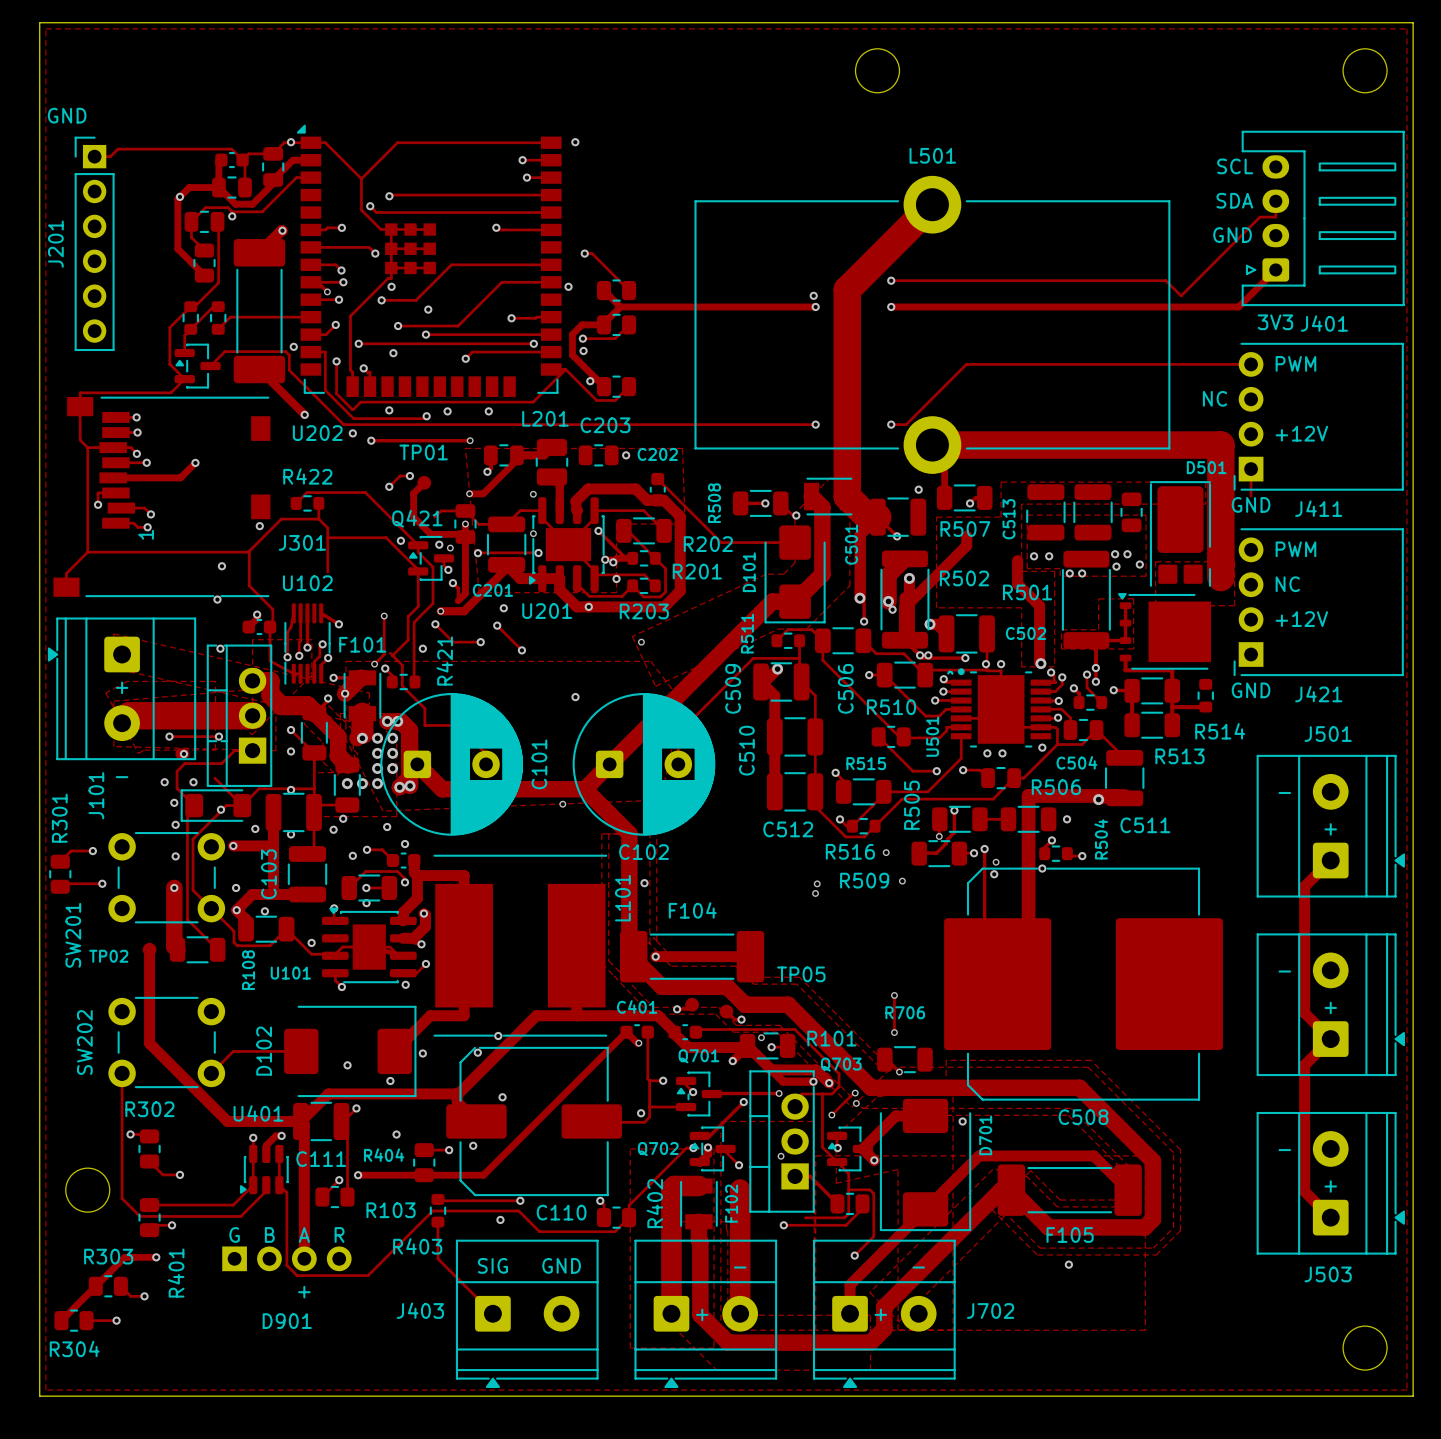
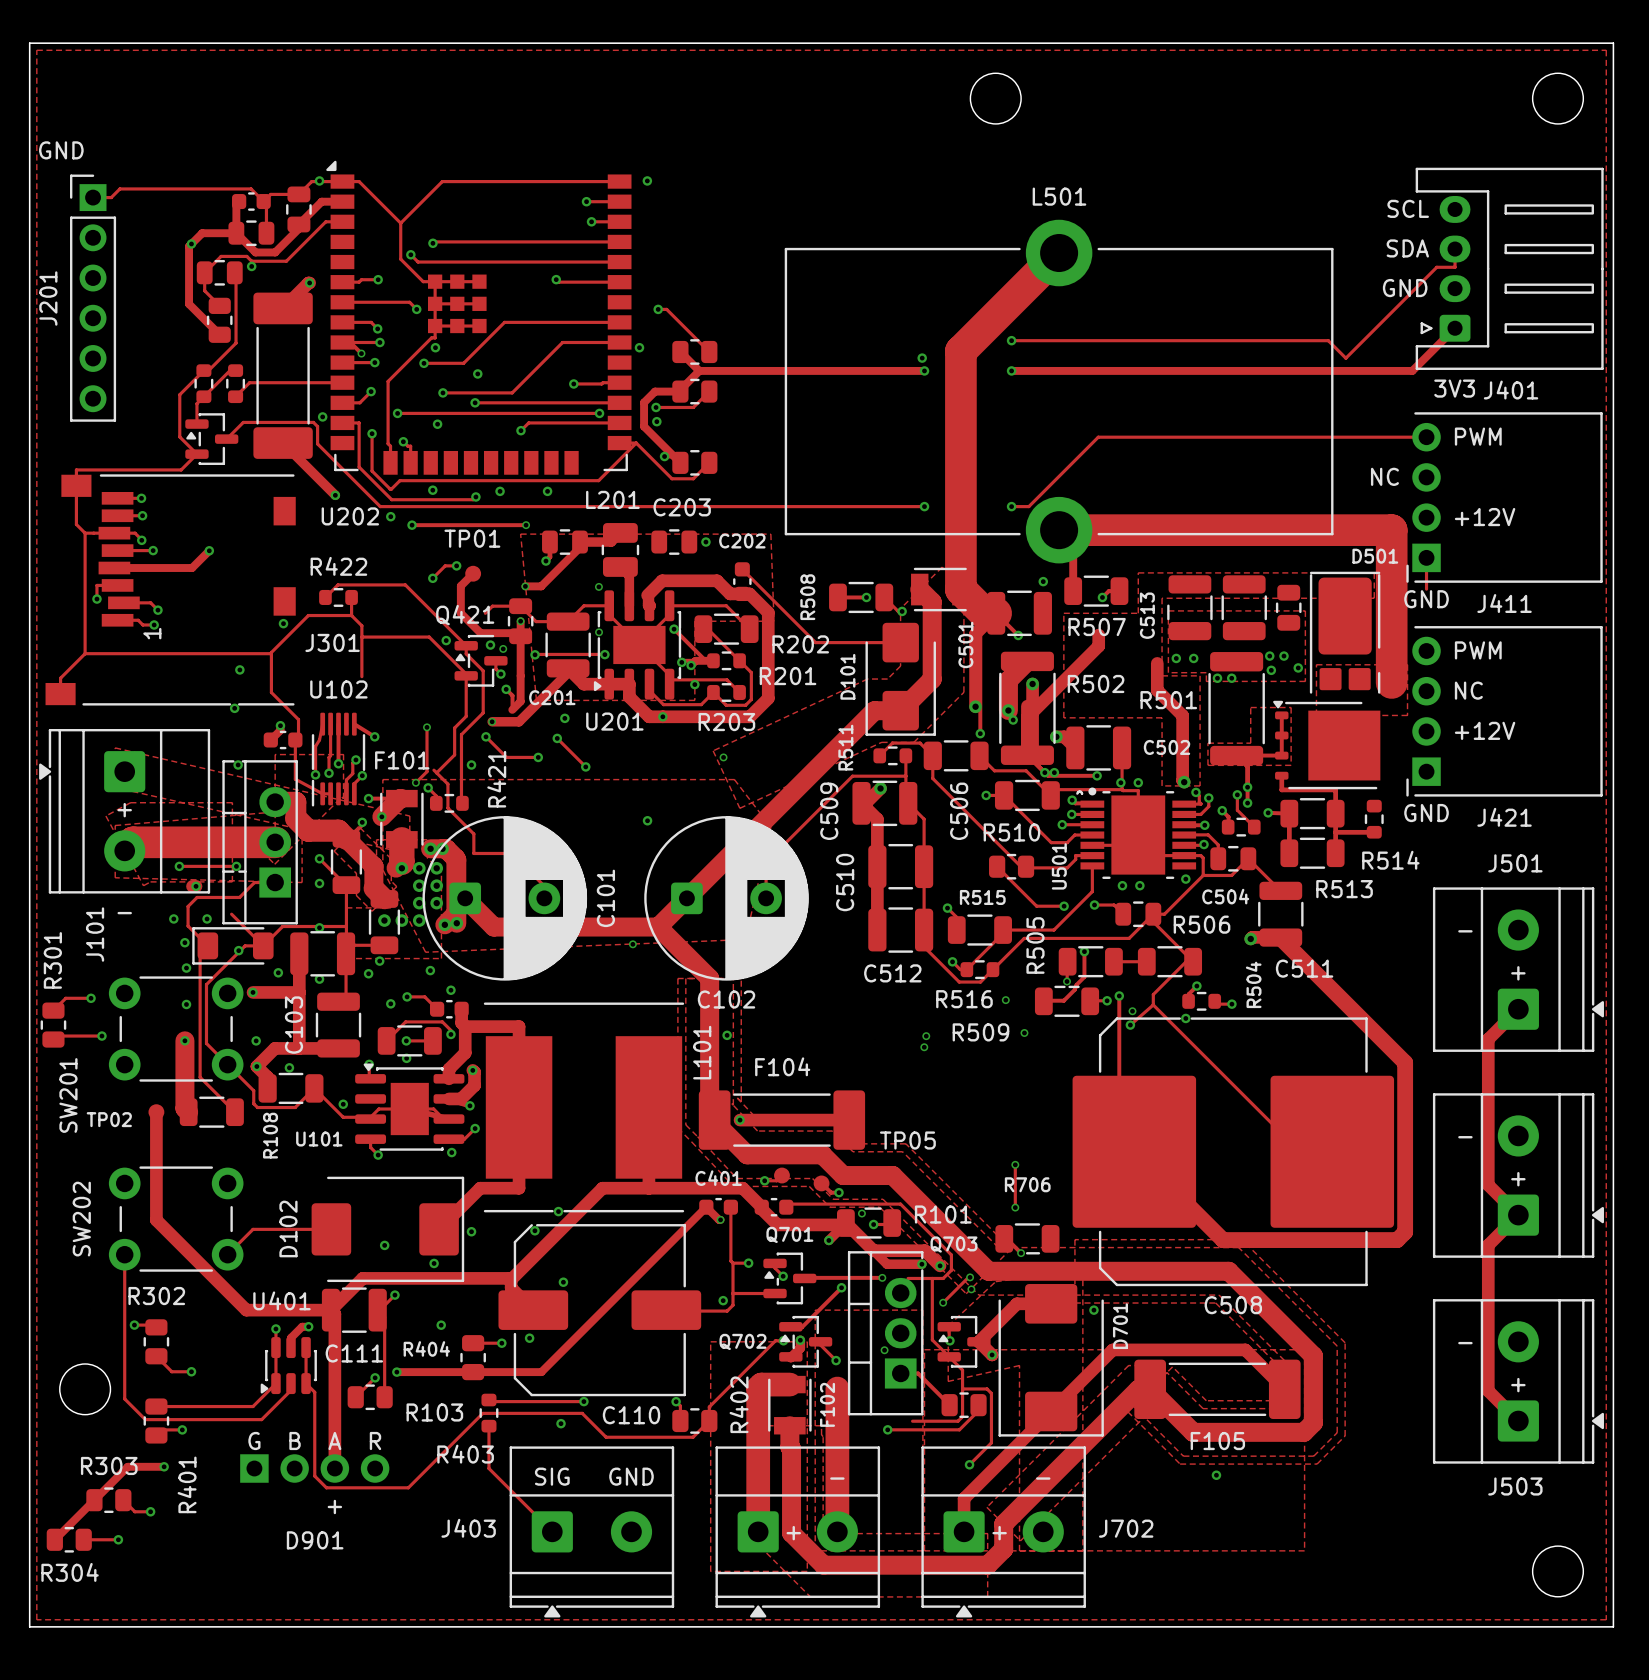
track: none -> (1149, 918) (1193, 961) (1186, 961) (1153, 994) (1153, 1004)
track: (1124, 795) (1028, 795) (1028, 929) -> none
track: none -> (1280, 937) (1405, 1062) (1405, 1232) (1397, 1240) (1223, 1240) (1134, 1151)
via: (1067, 819) -> none
track: none -> (1153, 1004) (1300, 1151)
track: none -> (1153, 1004) (1130, 1025)

